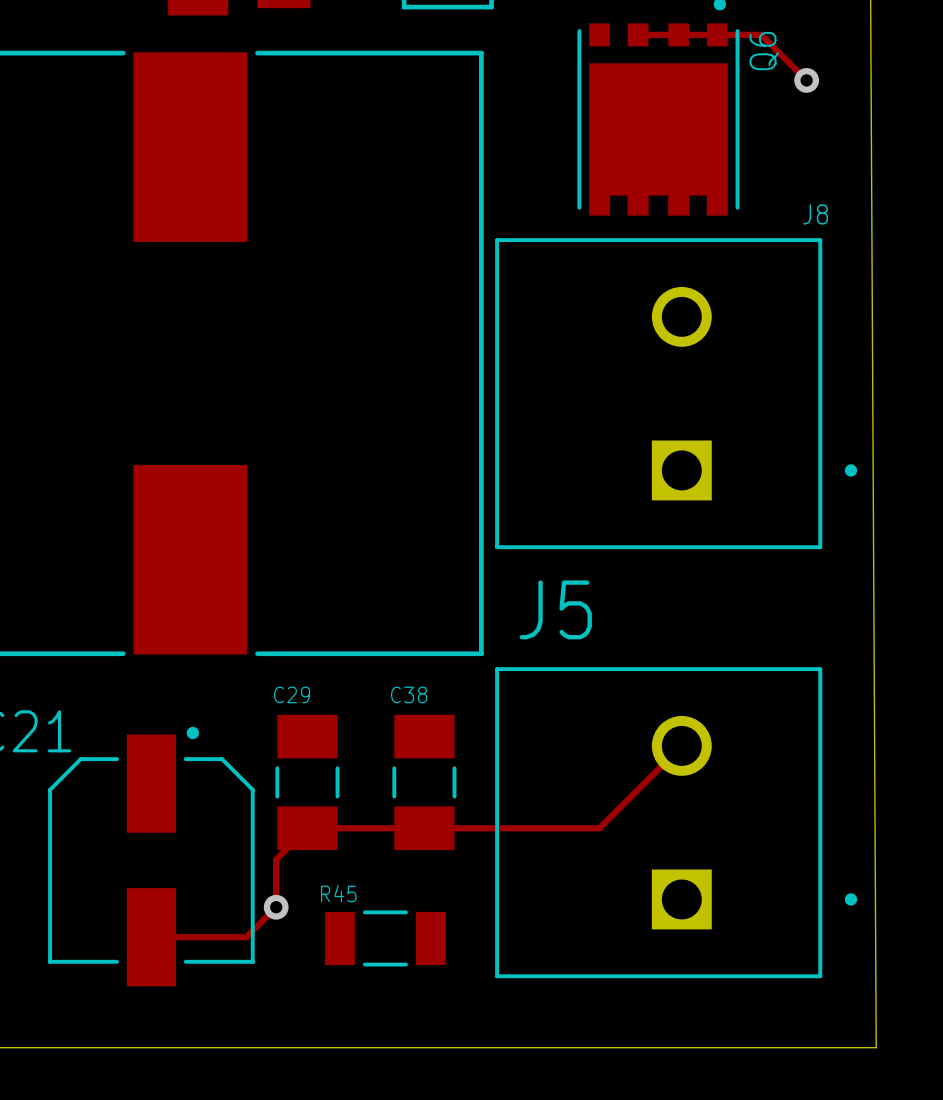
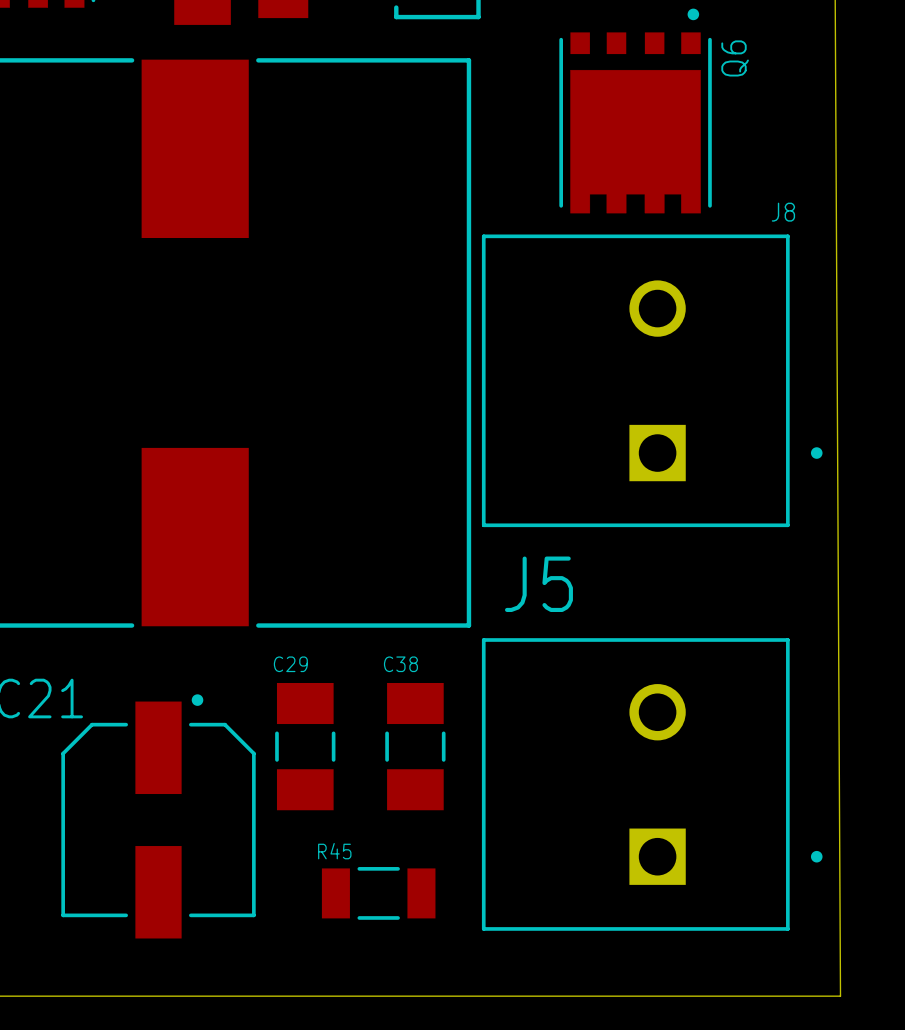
track: (638, 34) (761, 34) (806, 80) -> none
via: (806, 80) -> none
track: (681, 745) (599, 828) (307, 828) (276, 859) (276, 907) (246, 937) (151, 937) -> none
via: (276, 907) -> none

